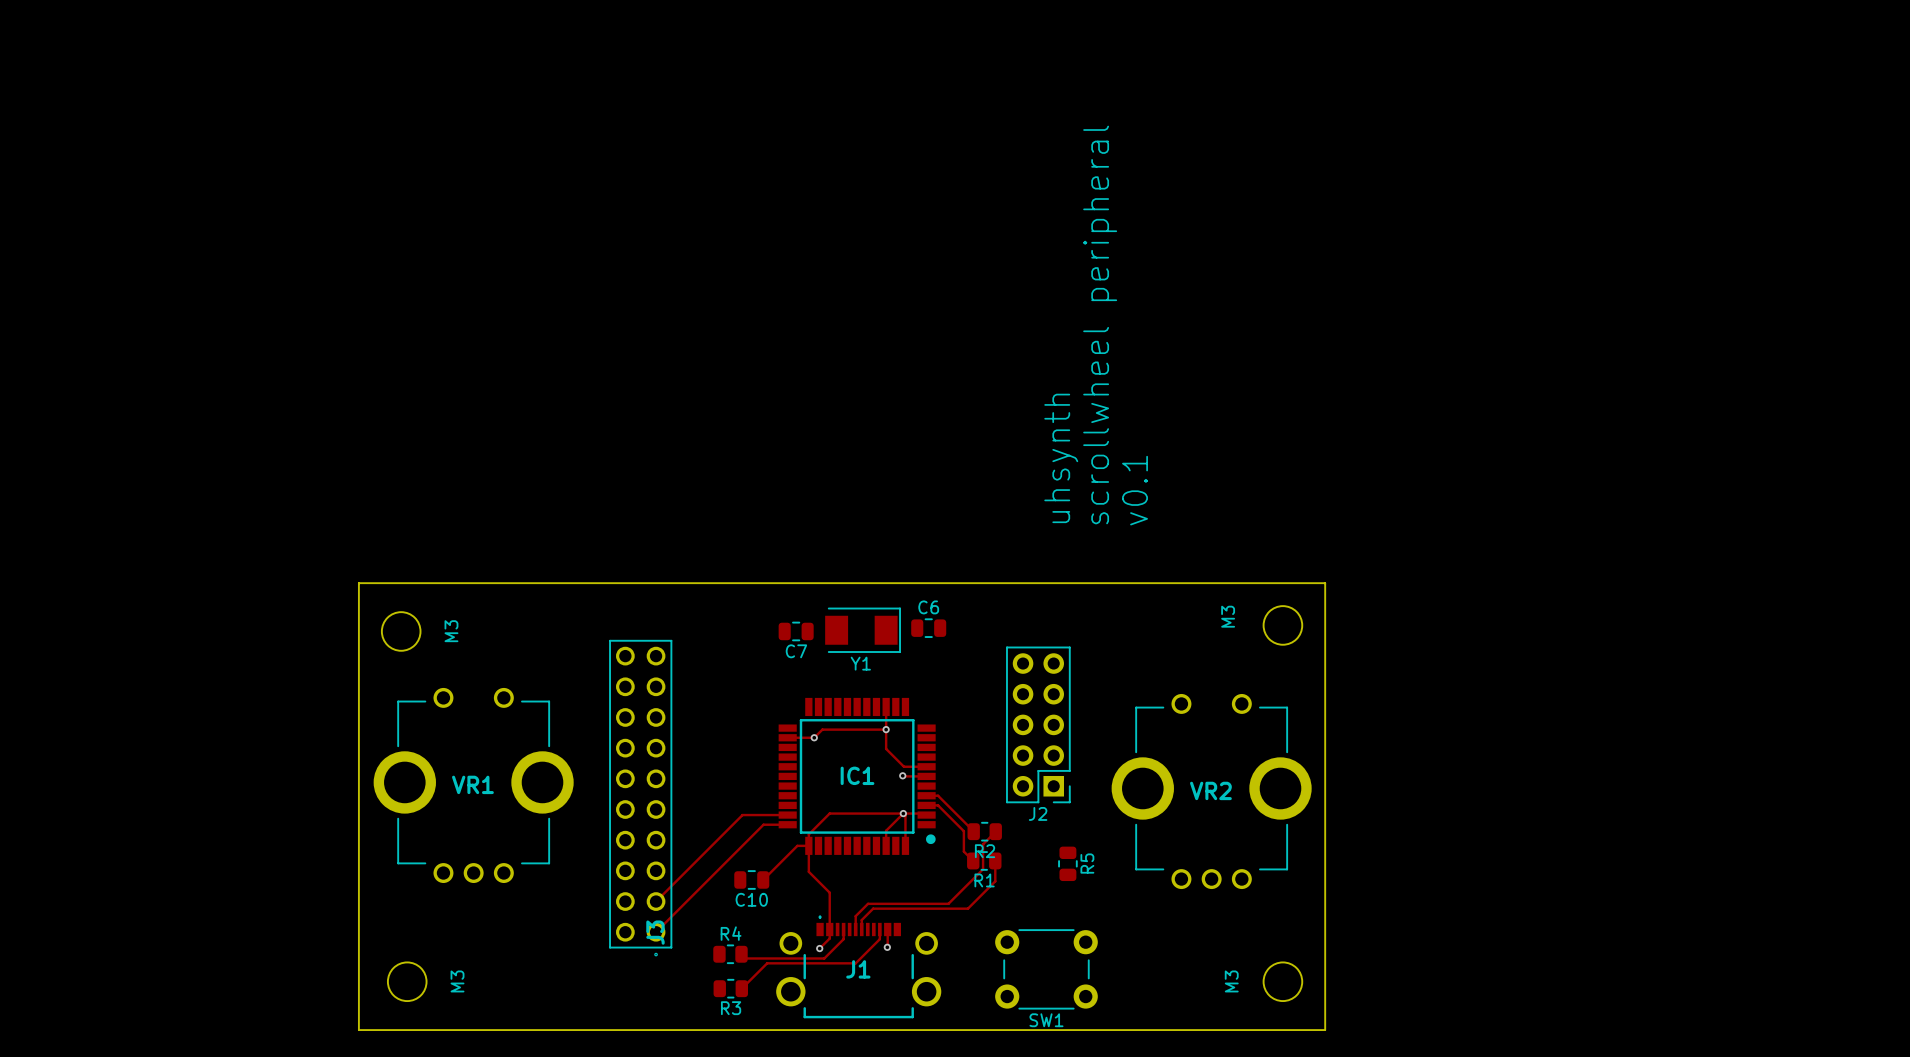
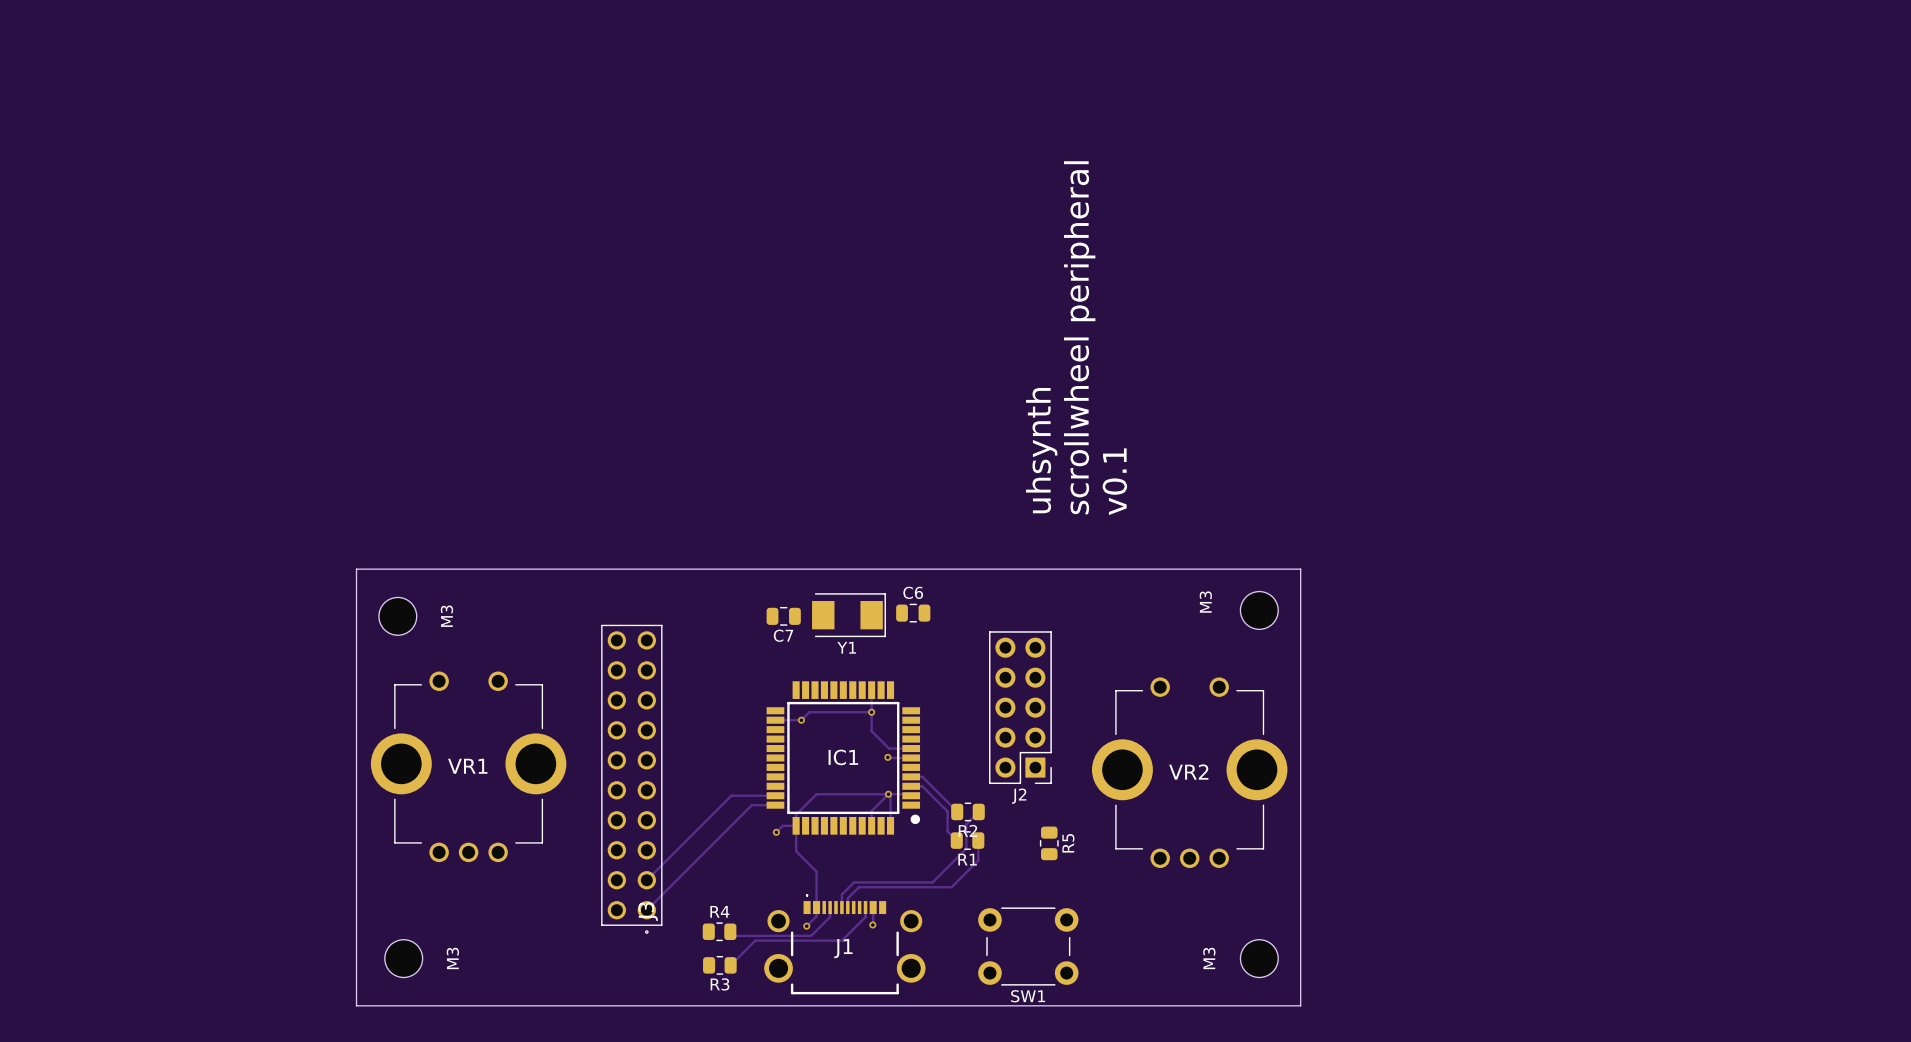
track: (797, 845) (763, 879) -> (784, 825) (776, 832)
via: none -> (776, 832)
C10: (751, 879) -> none

